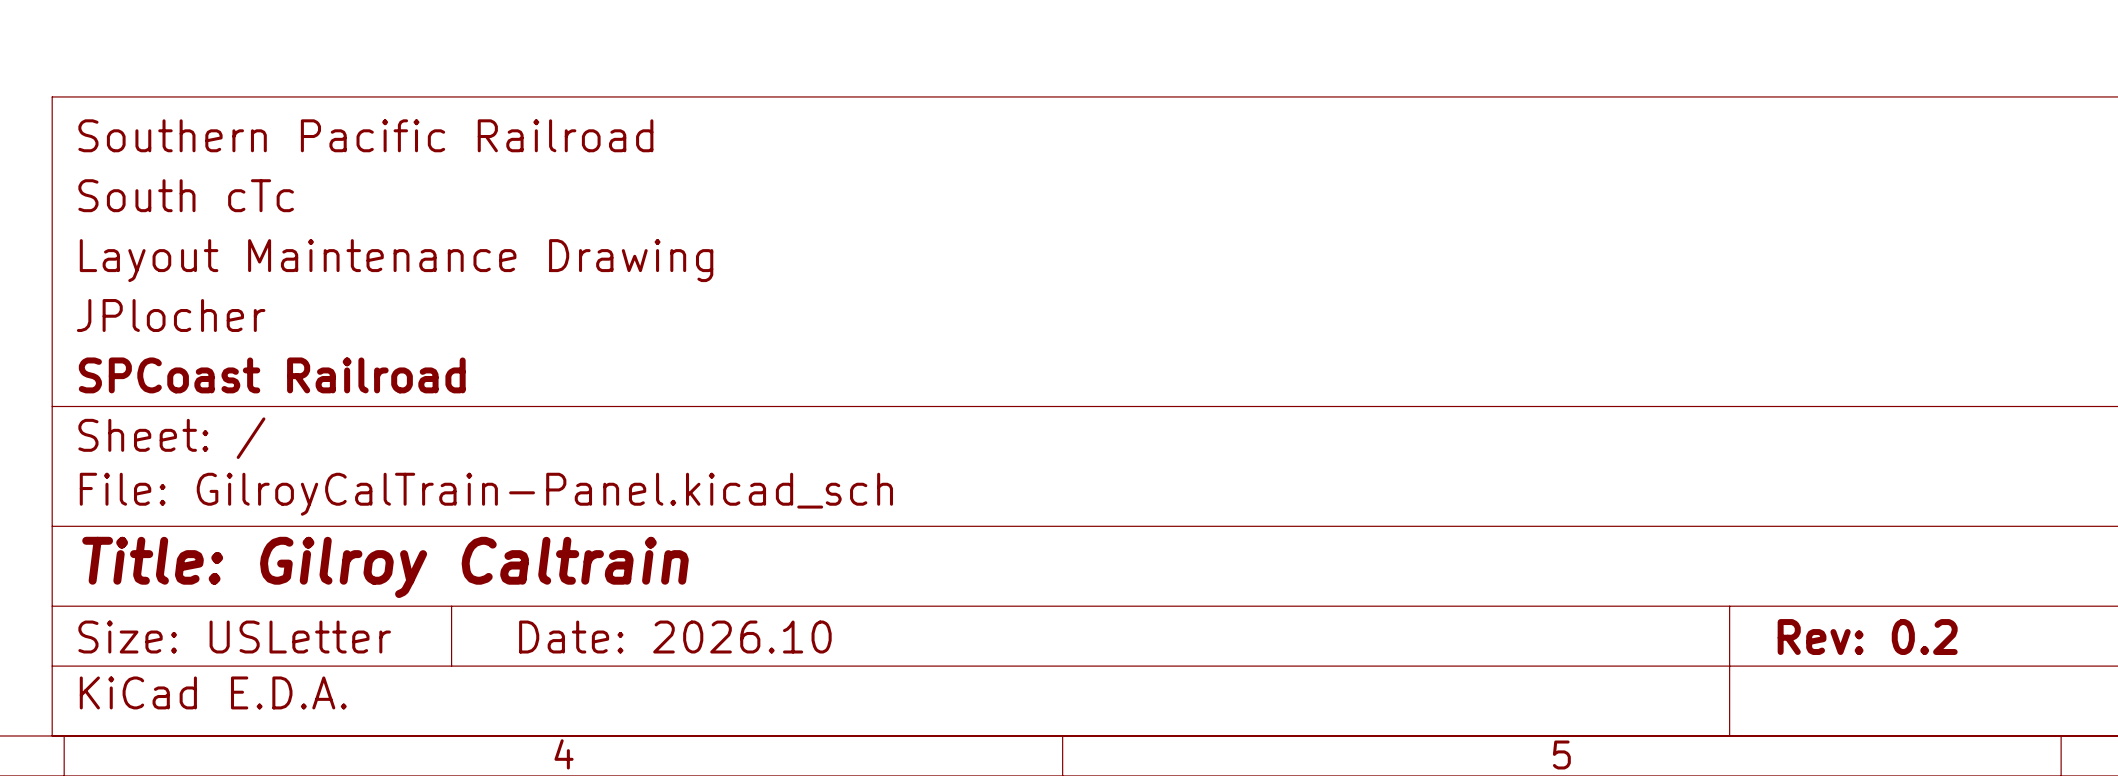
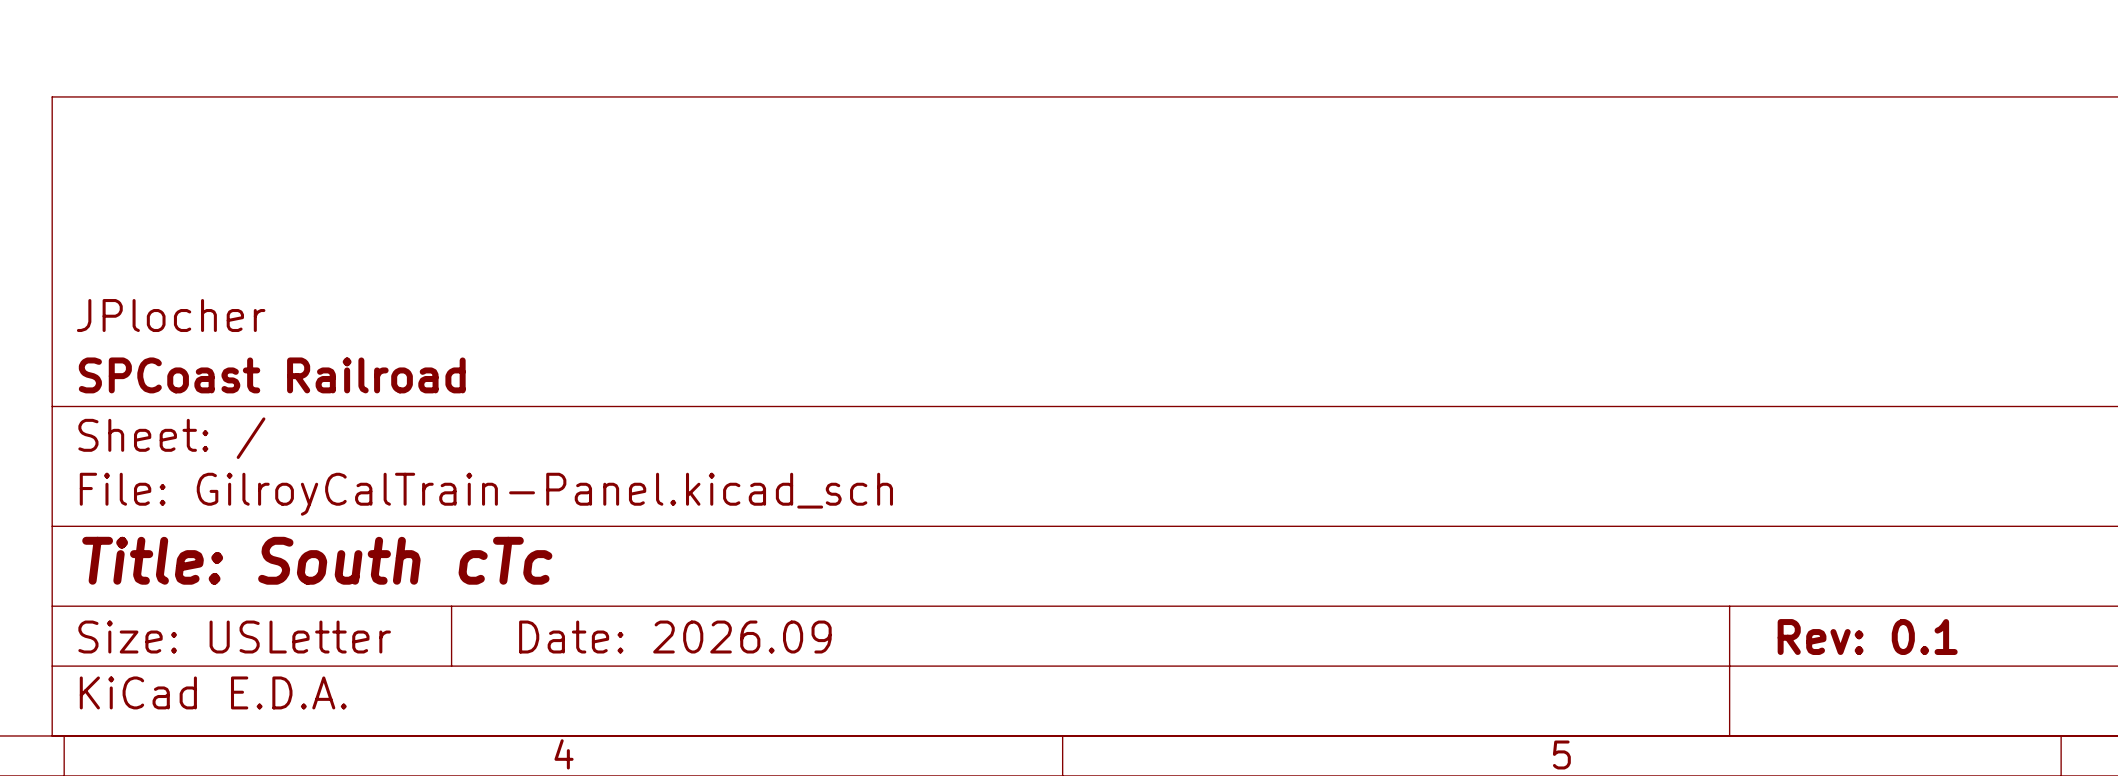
title block: Southern Pacific Railroad (365, 135) -> none
title block: South cTc (186, 195) -> none
title block: Layout Maintenance Drawing (396, 260) -> none
title block: Title: Gilroy Caltrain (385, 567) -> Title: South cTc (317, 560)
title block: Date: 2026.10 (675, 637) -> Date: 2026.09 (675, 637)
title block: Rev: 0.2 (1867, 637) -> Rev: 0.1 (1867, 637)

